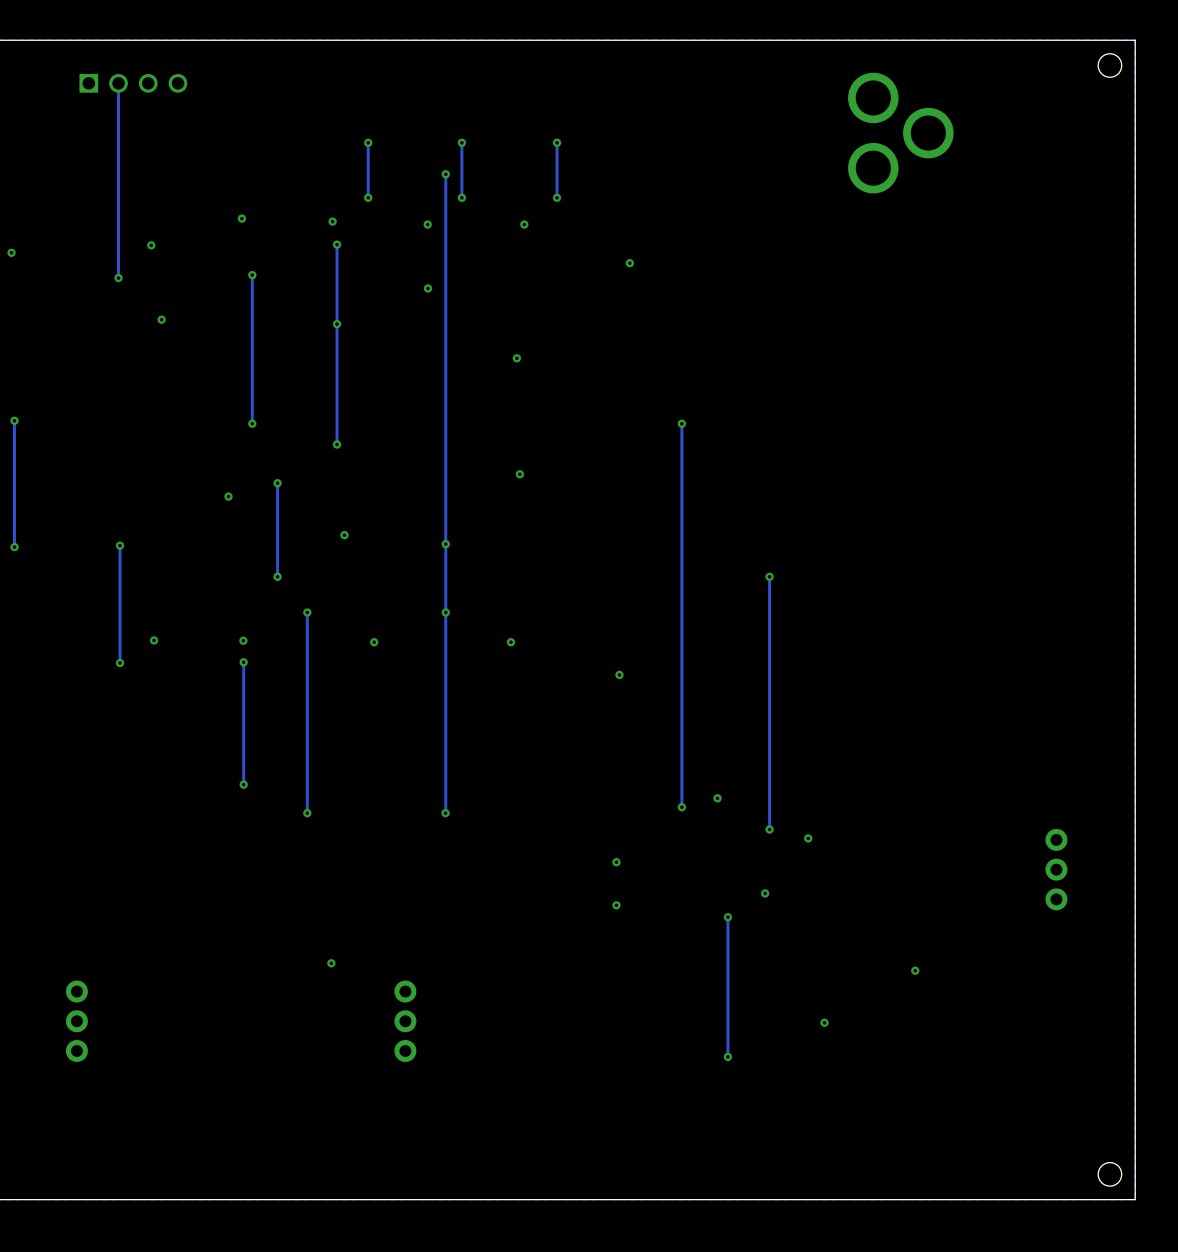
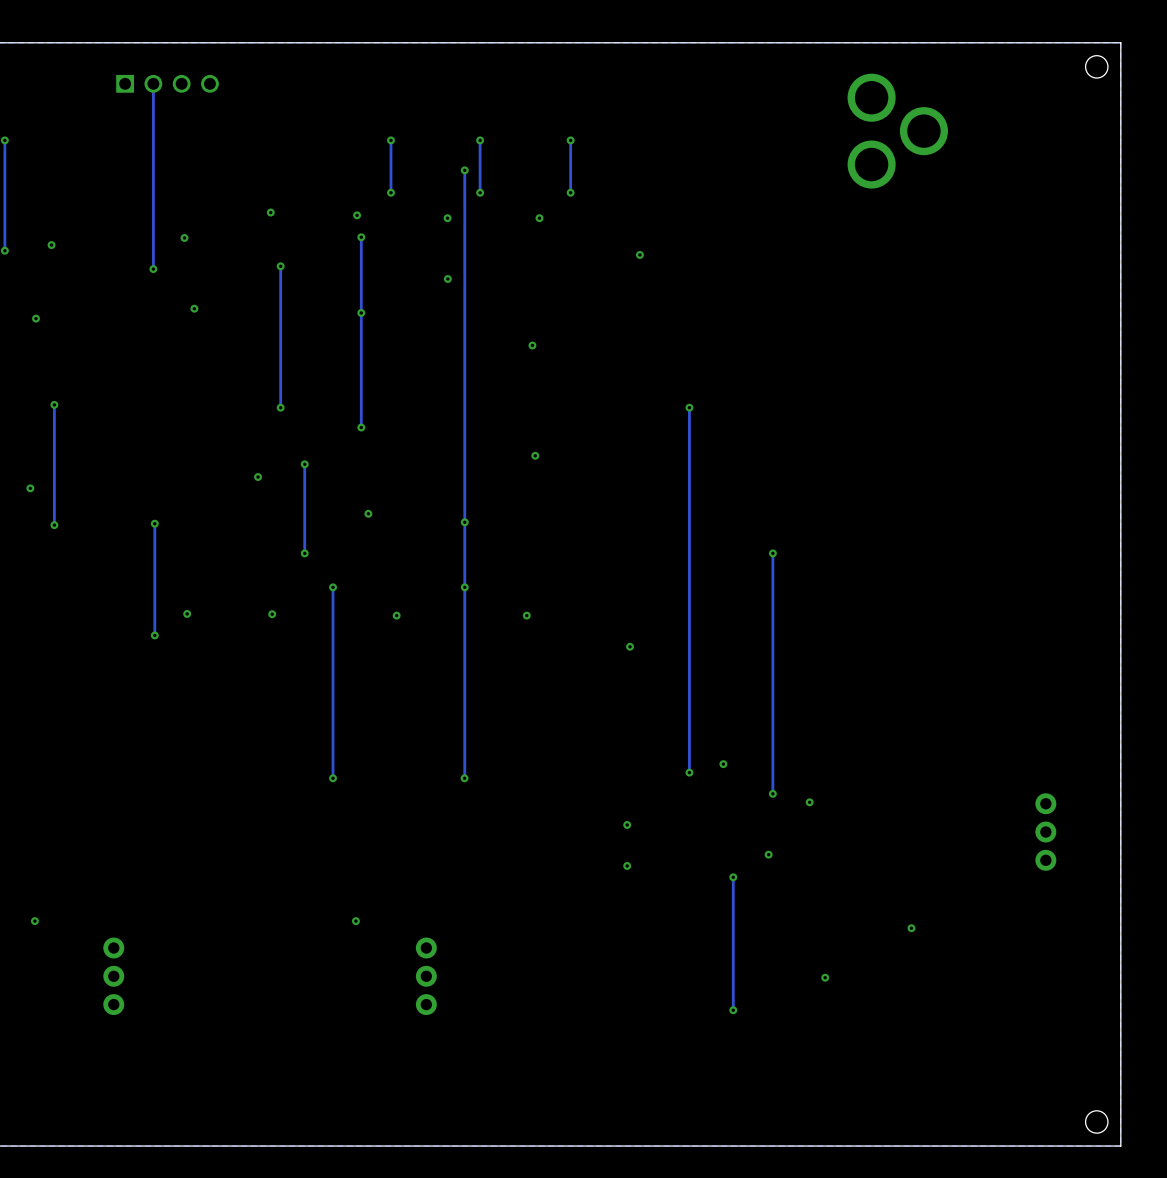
track: (243, 662) (243, 784) -> none
via: (243, 662) -> none
via: (243, 784) -> none

